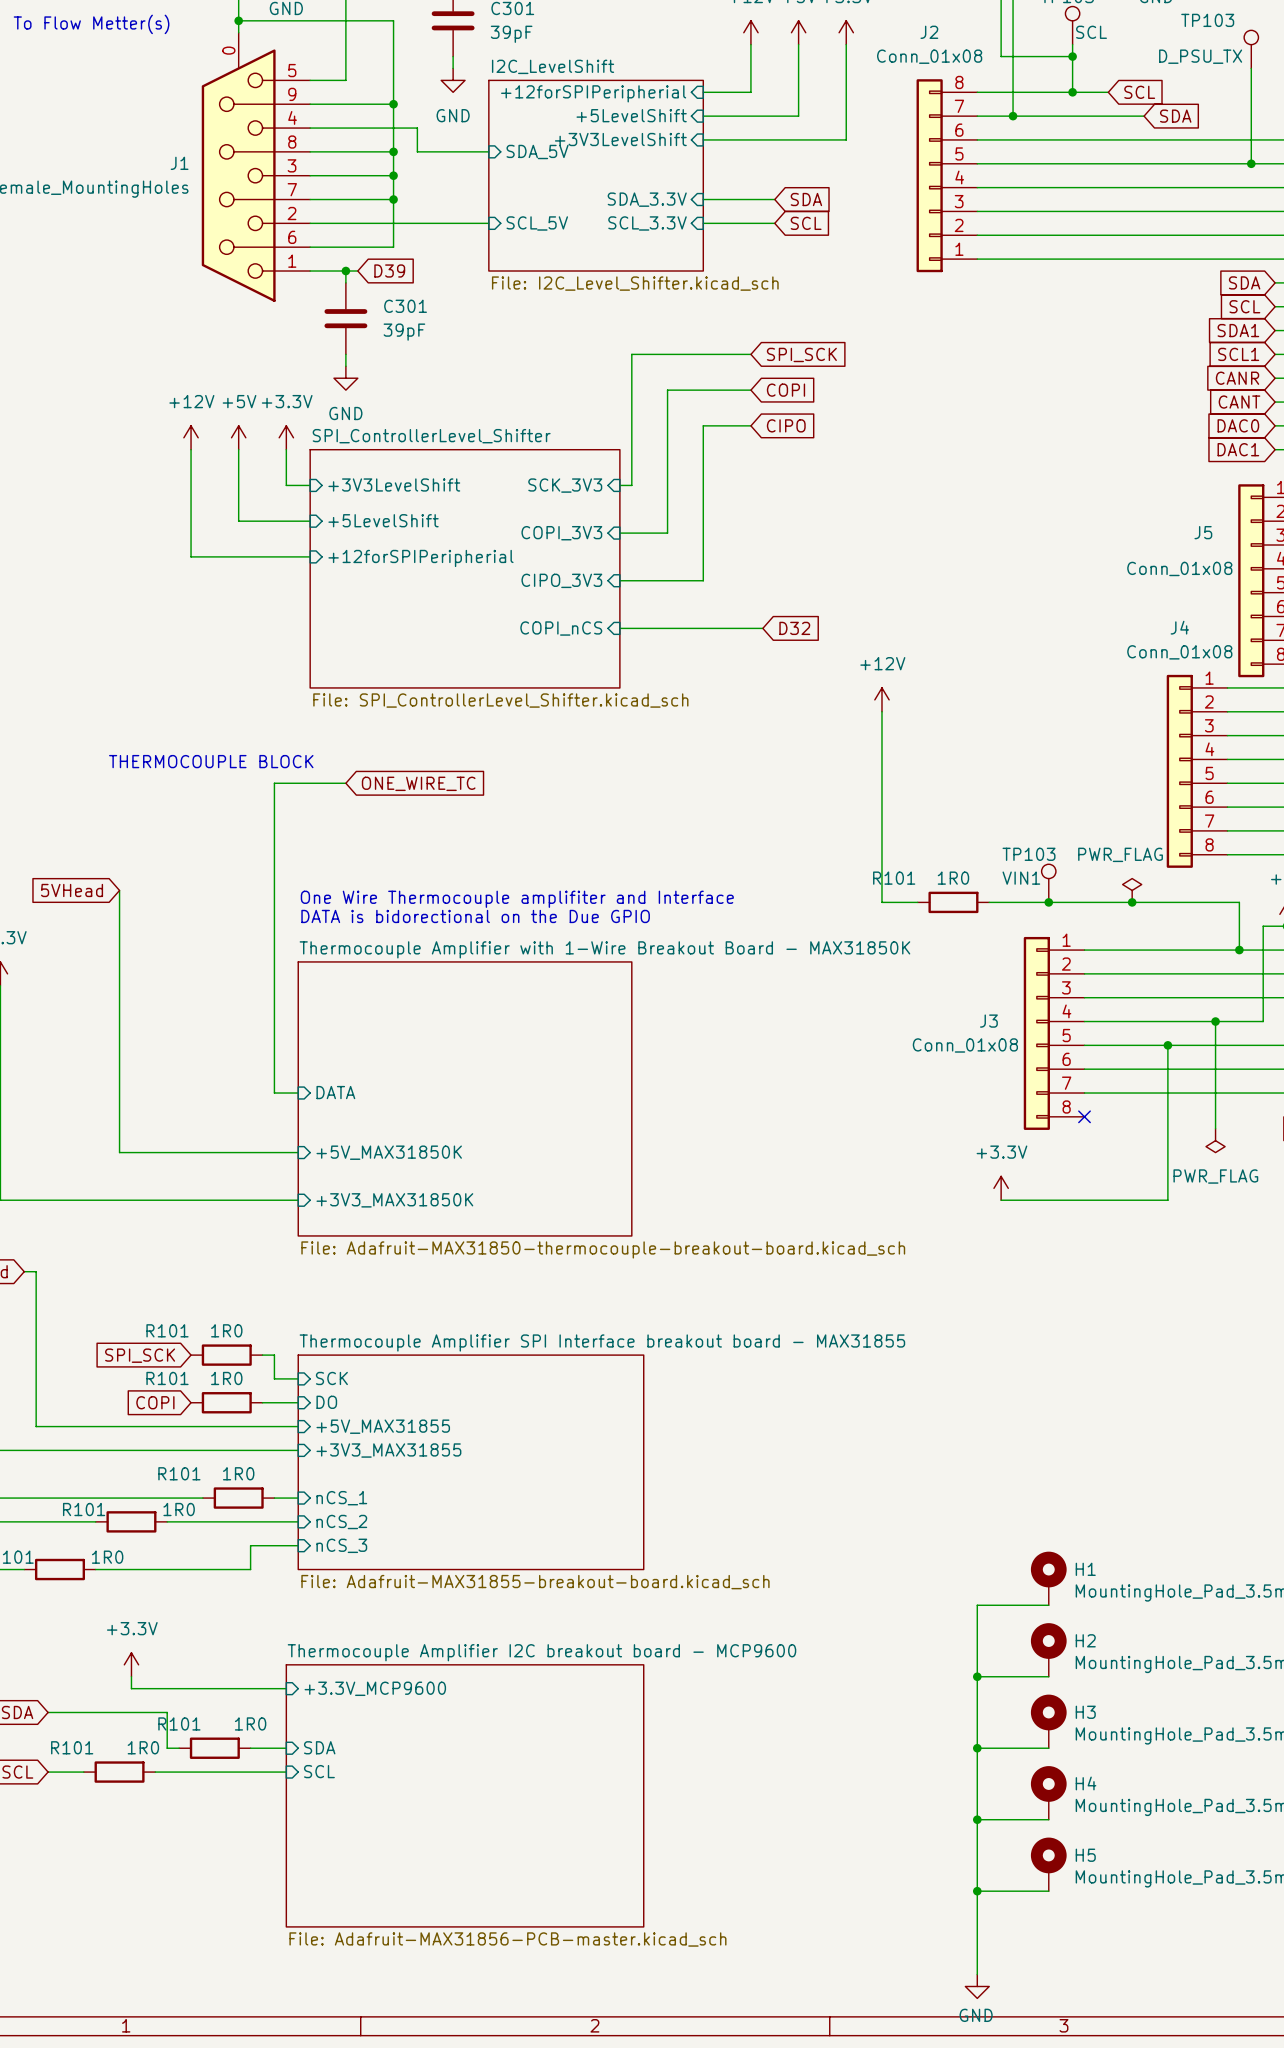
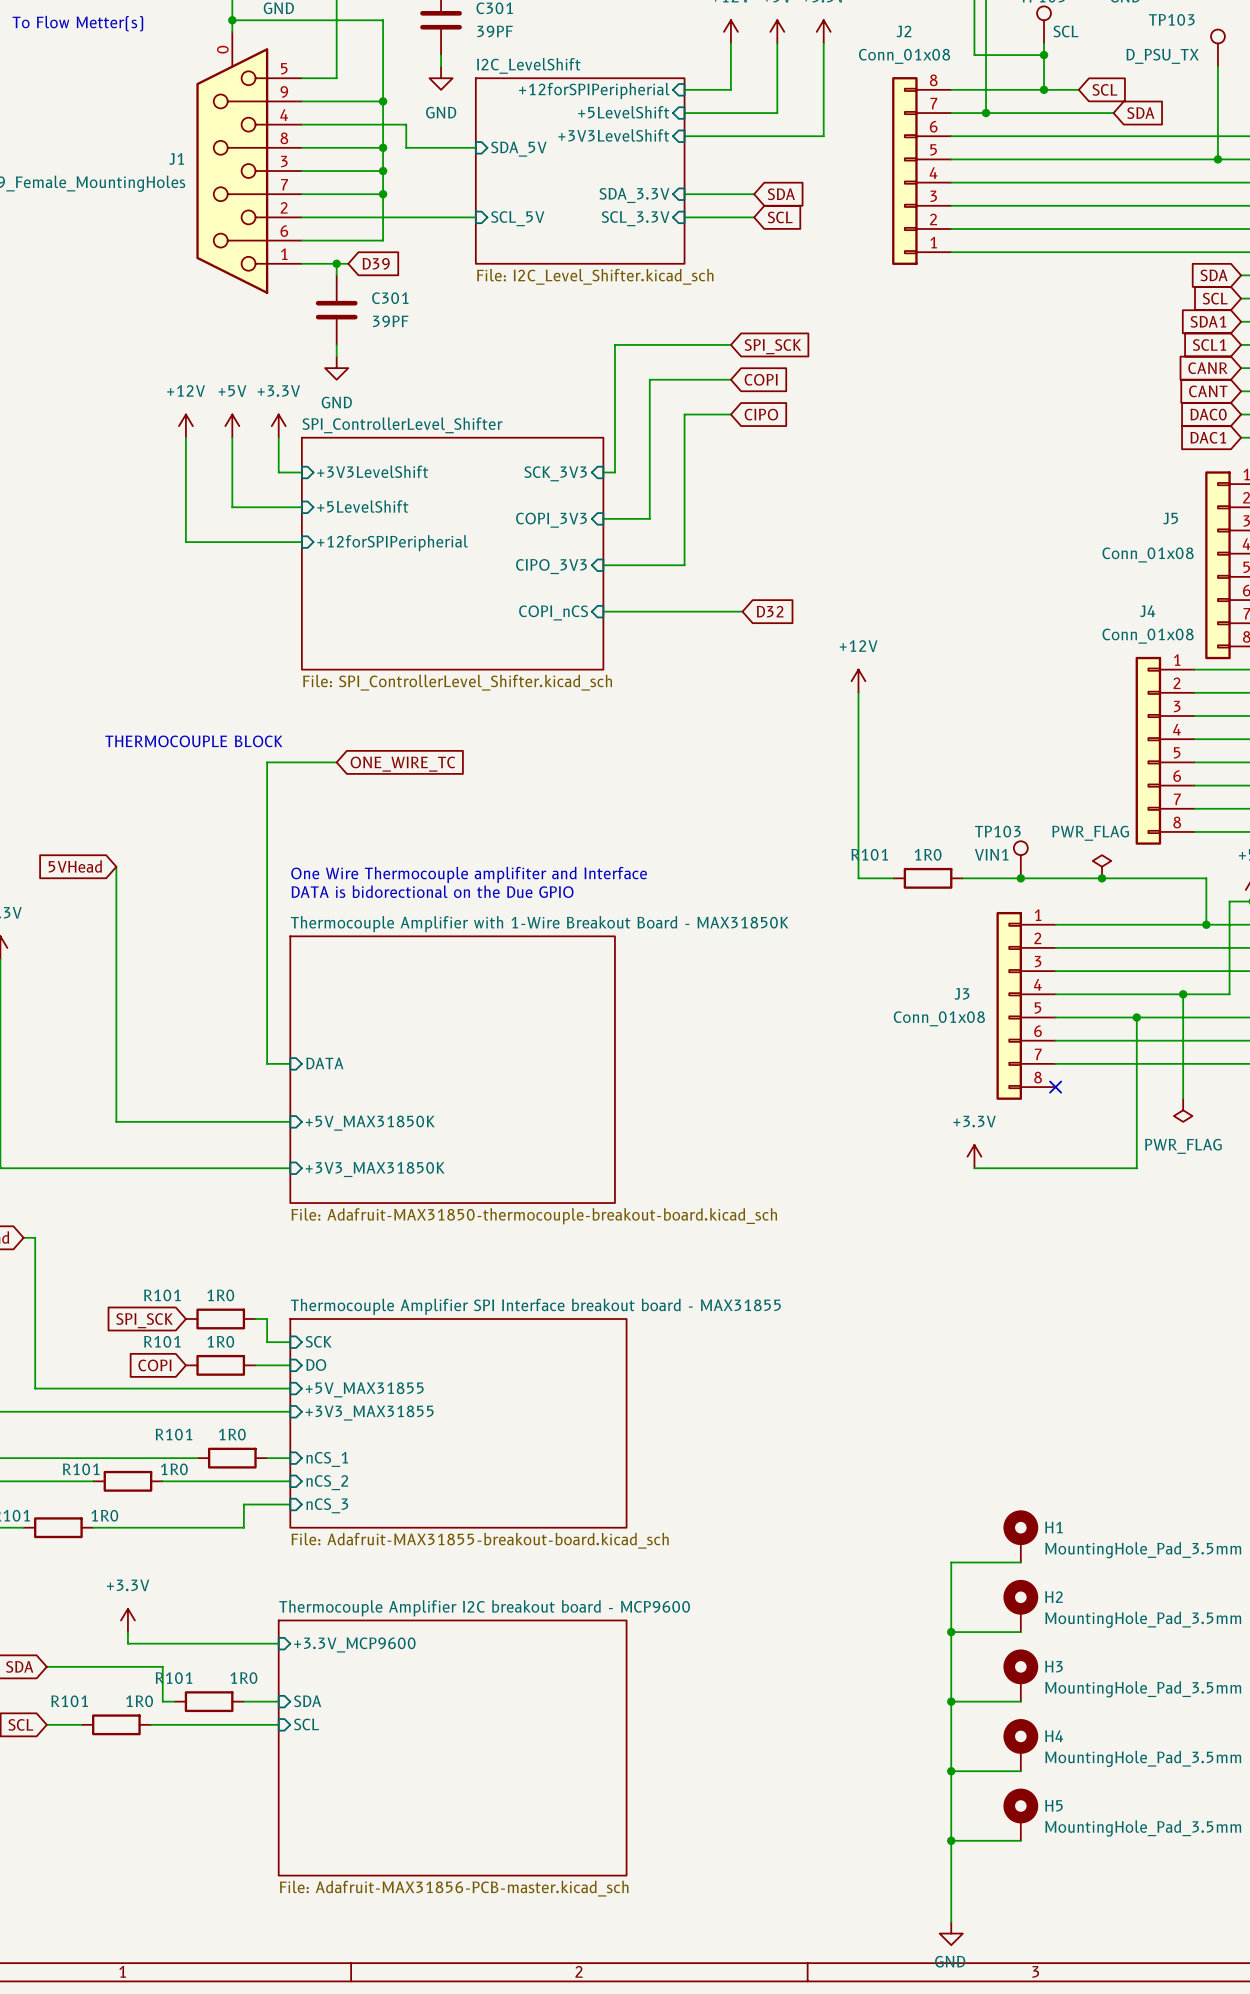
C301 value: 39pF (511, 34) -> 39PF (495, 31)
C301 value: 39pF (404, 332) -> 39PF (390, 321)

